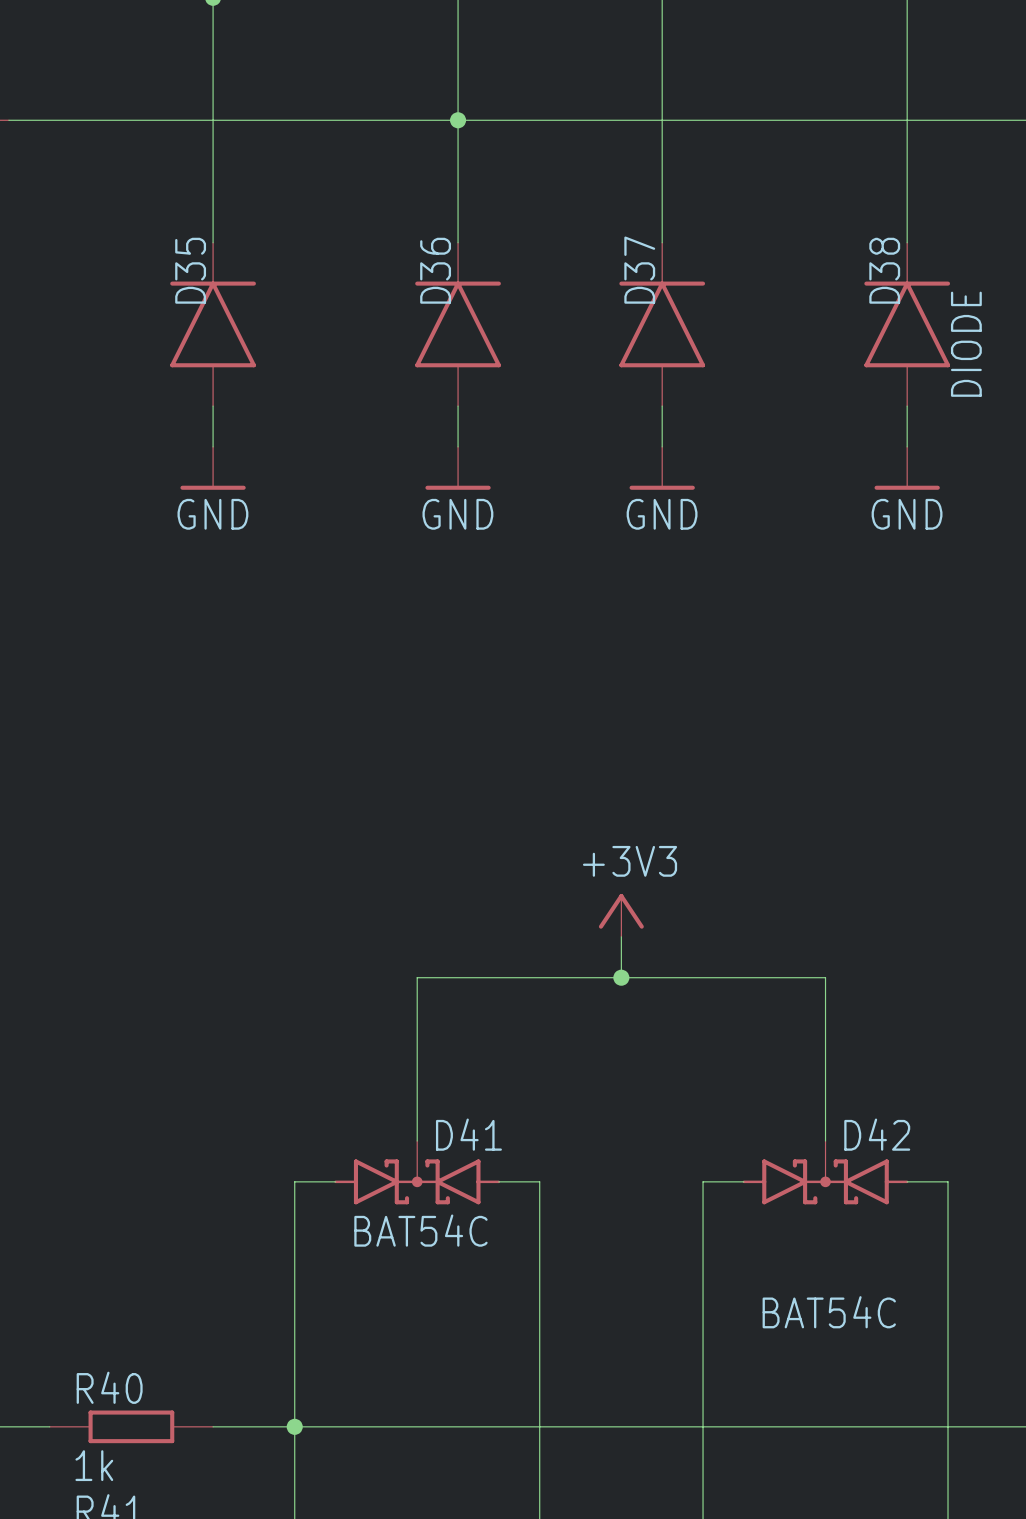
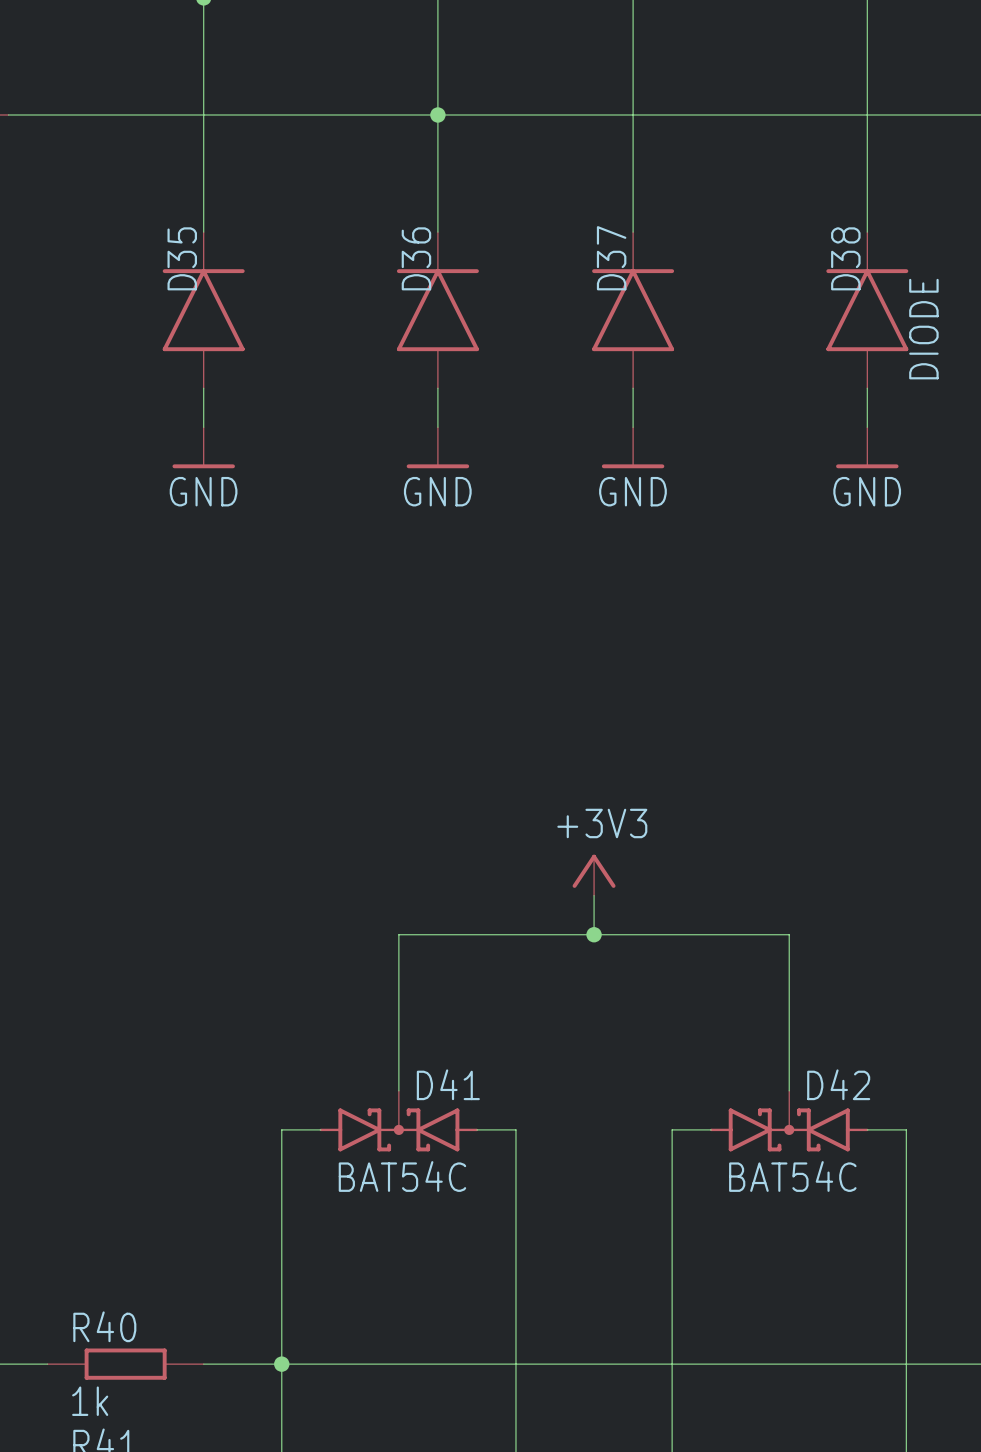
D42 value position: BAT54C (829, 1312) -> BAT54C (792, 1176)

